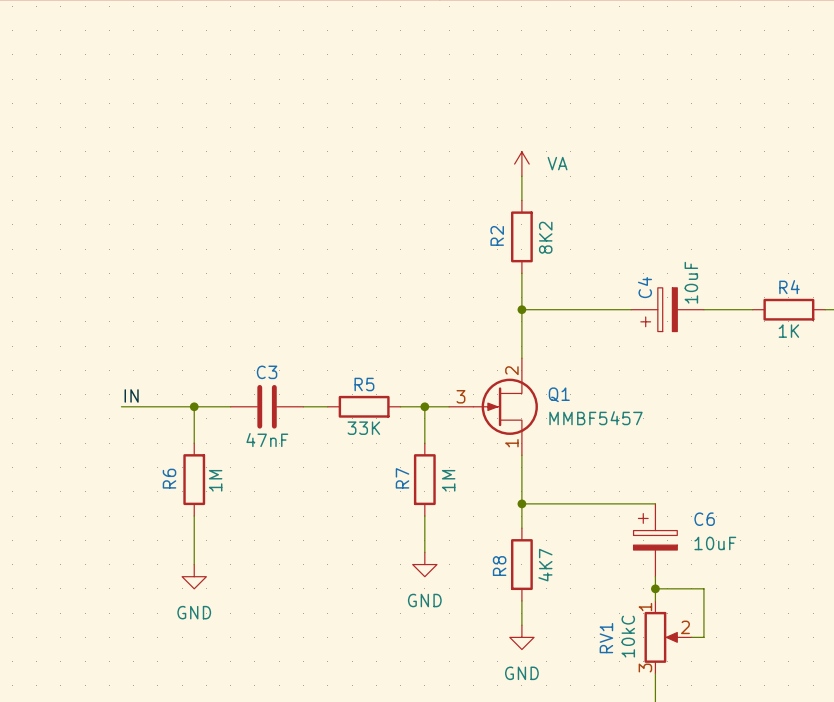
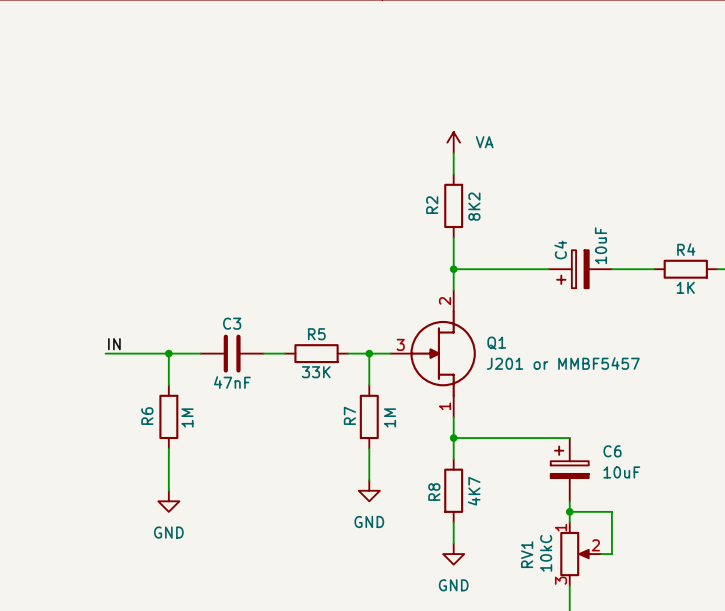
Q1 symbol: [449, 358, 538, 456] -> [390, 290, 476, 417]
Q1 value: MMBF5457 (595, 418) -> J201 or MMBF5457 (563, 363)

